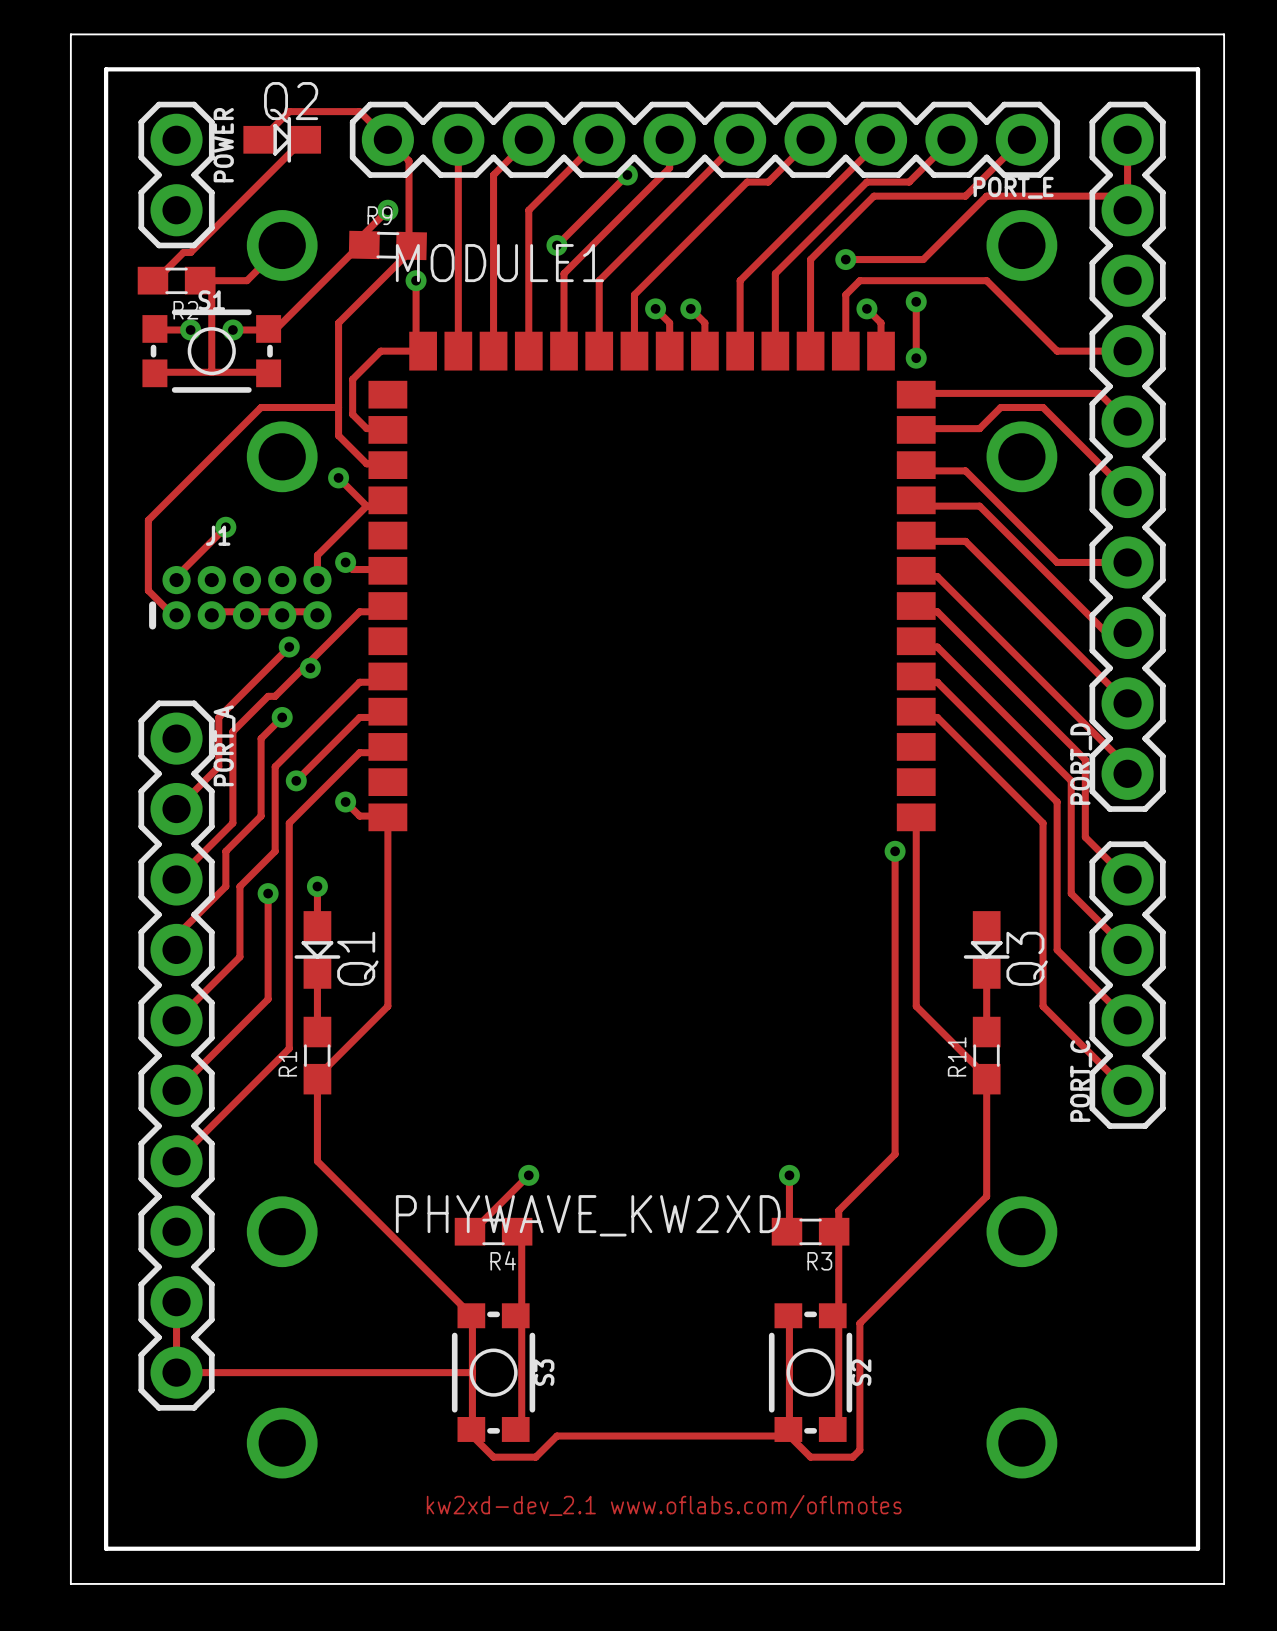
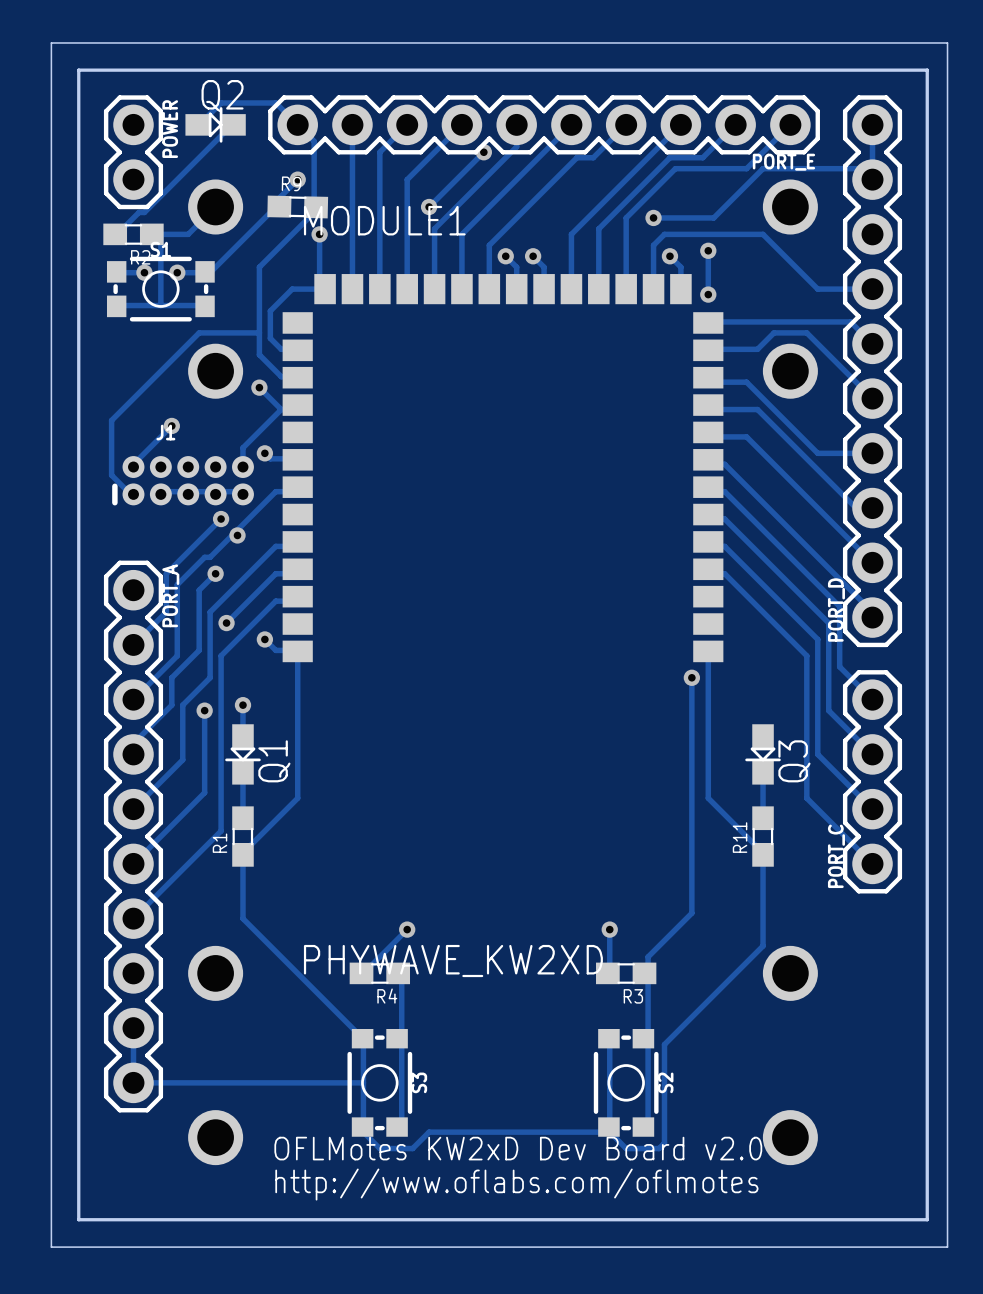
text: none -> OFLMotes KW2xD Dev Board v2.0 (518, 1148)
text: kw2xd-dev_2.1 www.oflabs.com/oflmotes (664, 1506) -> http://www.oflabs.com/oflmotes (516, 1184)

